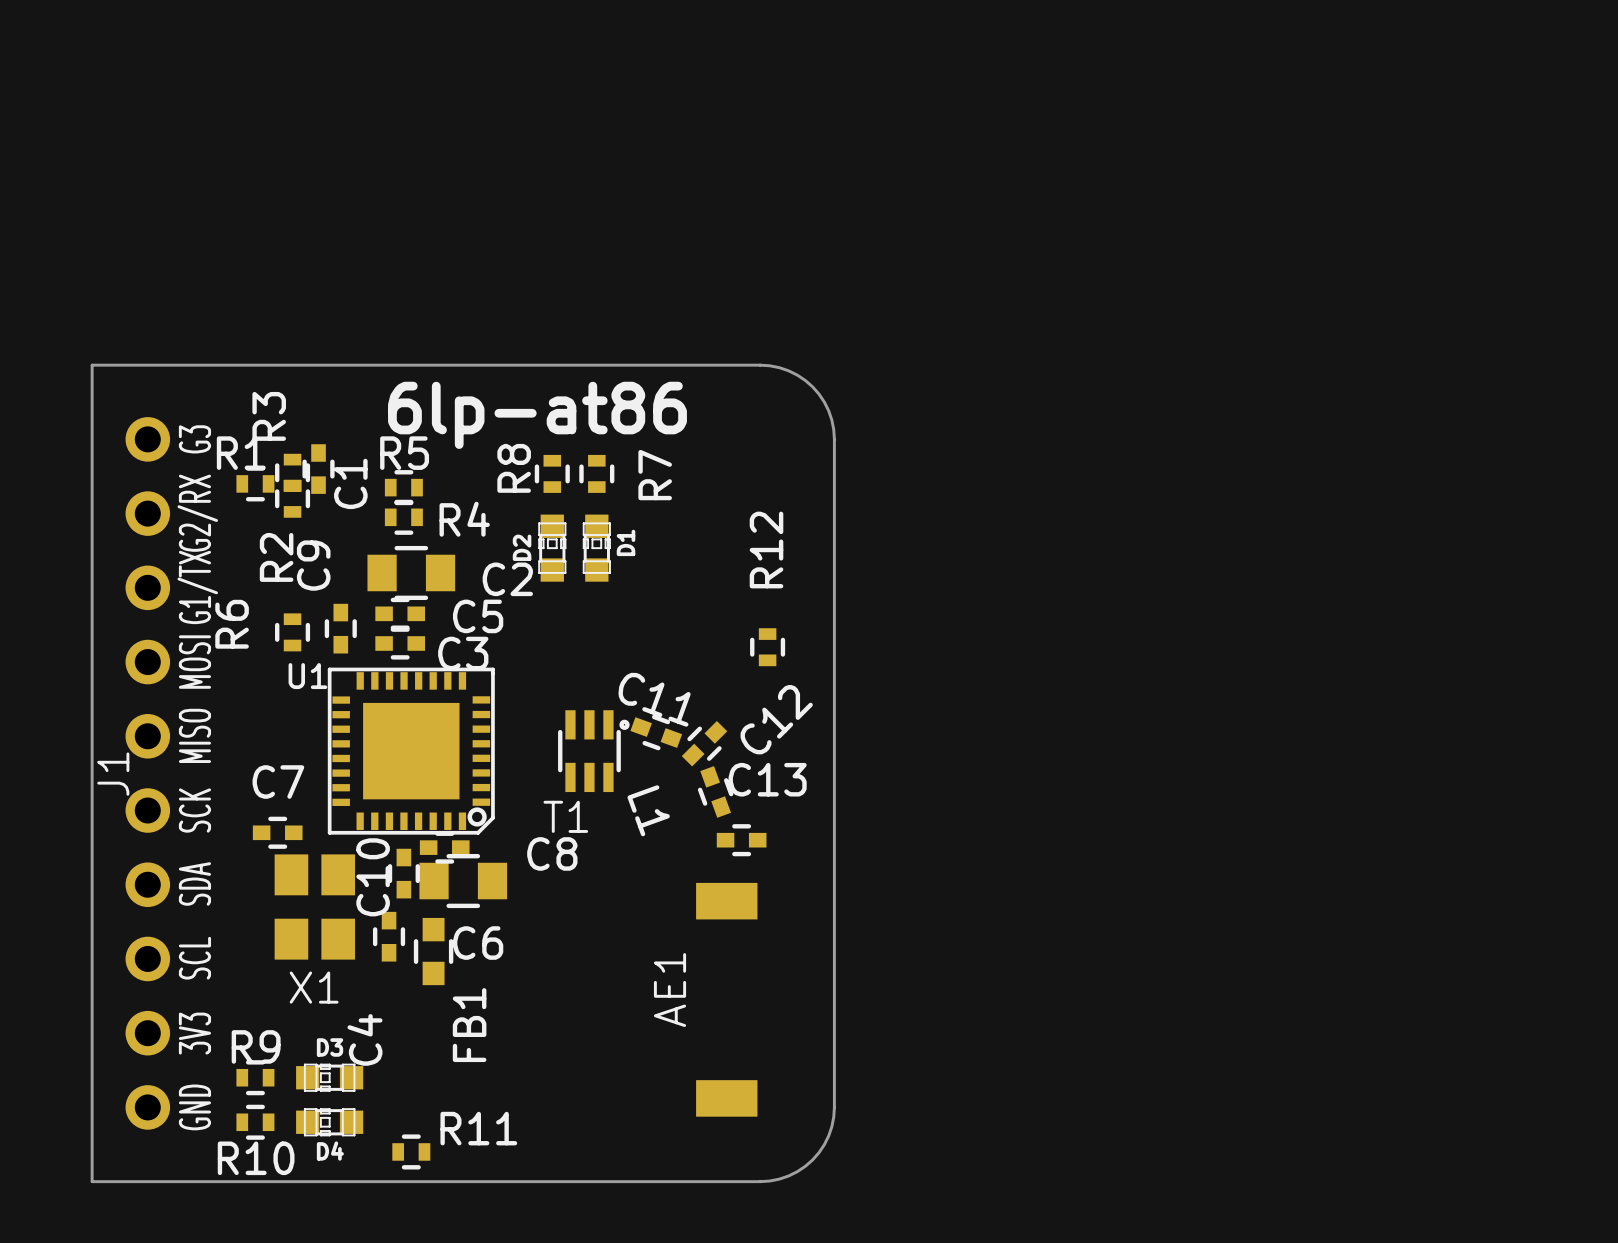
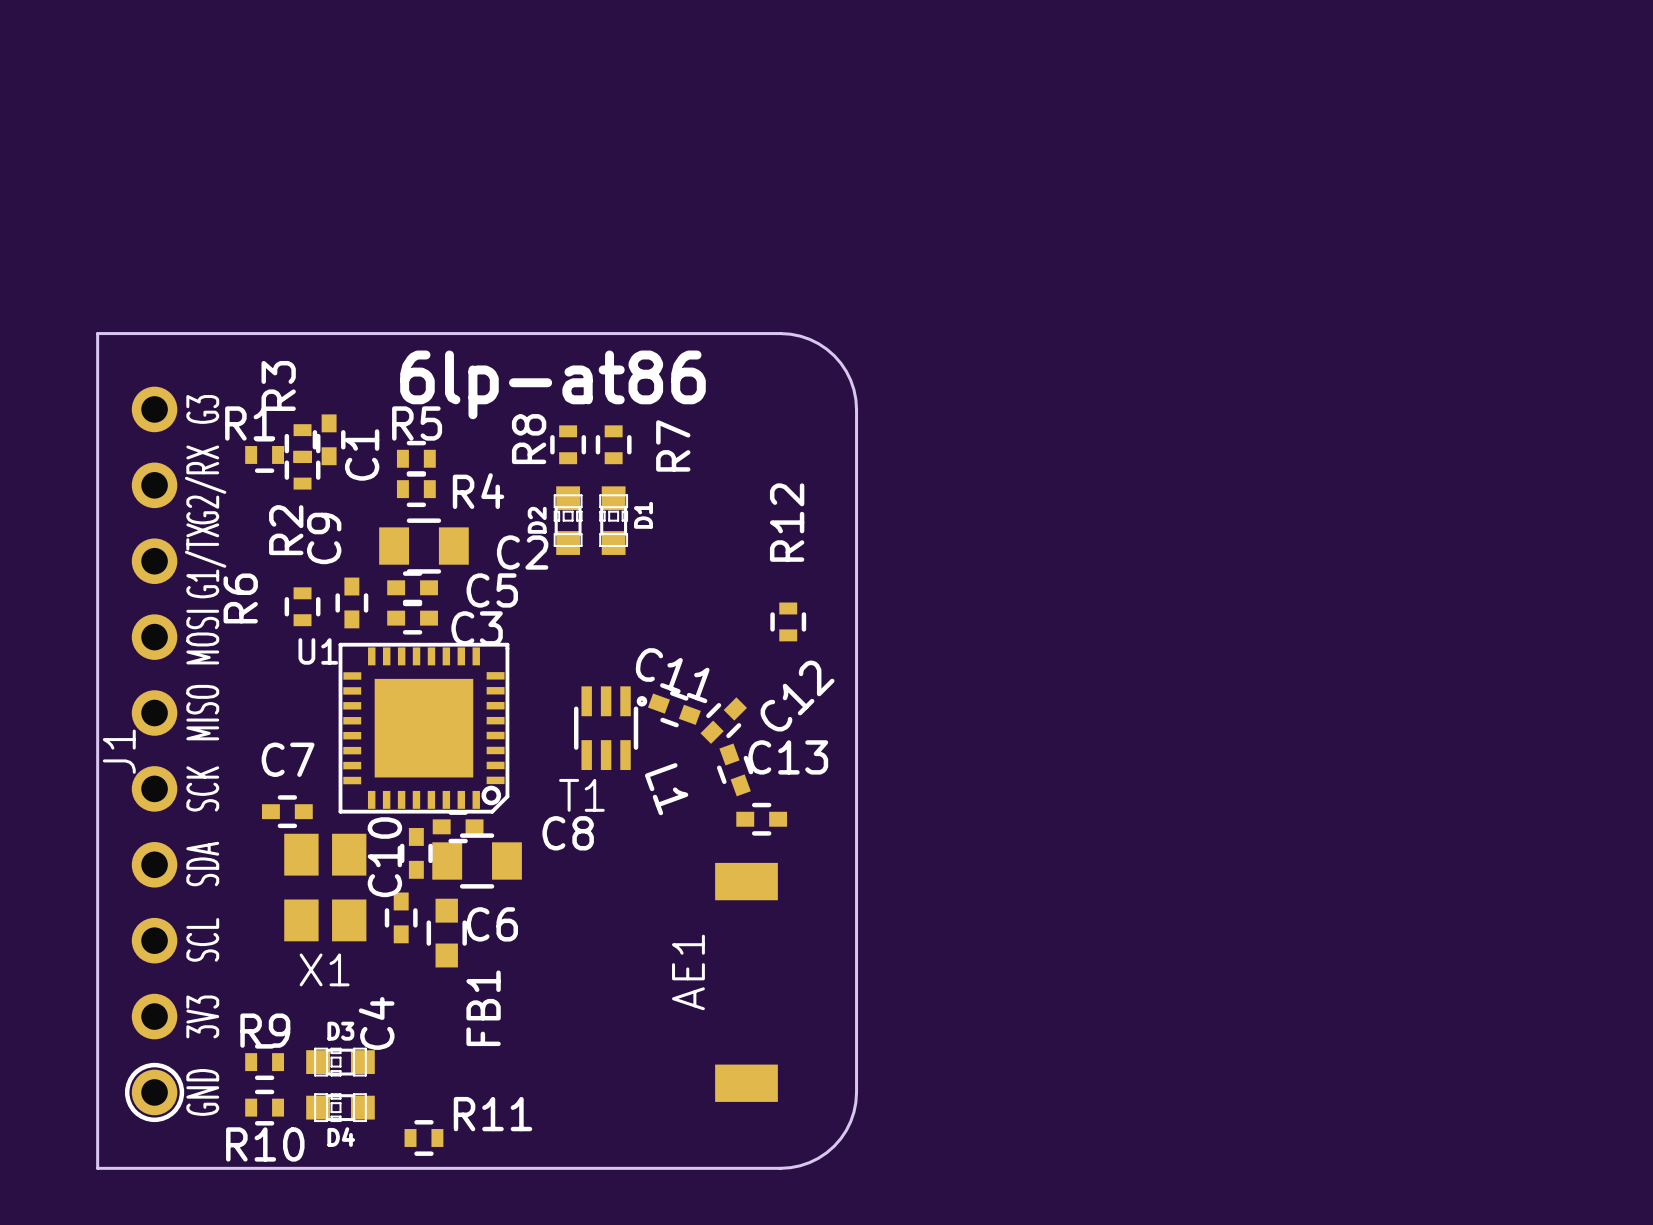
J1 footprint: [125, 417, 171, 1130] -> [124, 386, 185, 1123]

